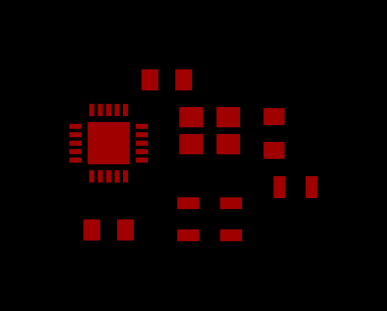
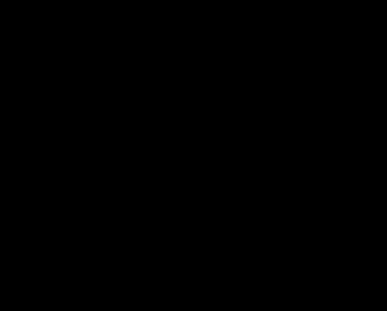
part: (166, 79) -> none
part: (209, 130) -> none
part: (274, 133) -> none
part: (108, 143) -> none
part: (295, 187) -> none
part: (188, 219) -> none
part: (231, 219) -> none
part: (108, 229) -> none

